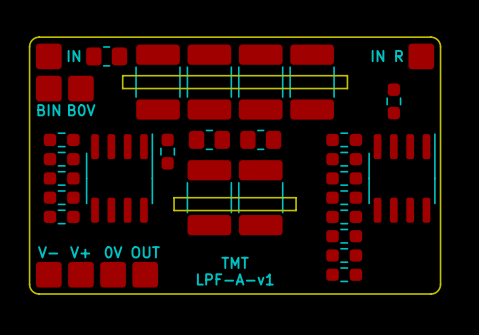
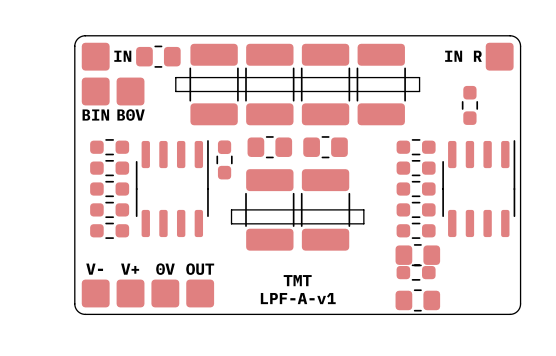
part footprint: [326, 228, 363, 244] -> [395, 244, 441, 267]
part footprint: [326, 267, 363, 283] -> [395, 289, 441, 312]

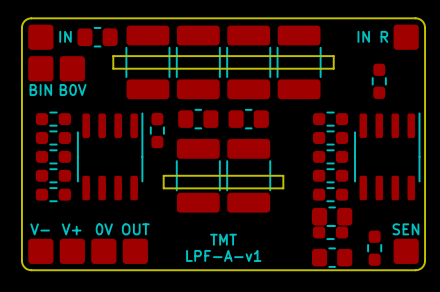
text: none -> SEN (405, 229)
part: none -> (374, 248)
part: none -> (406, 251)

